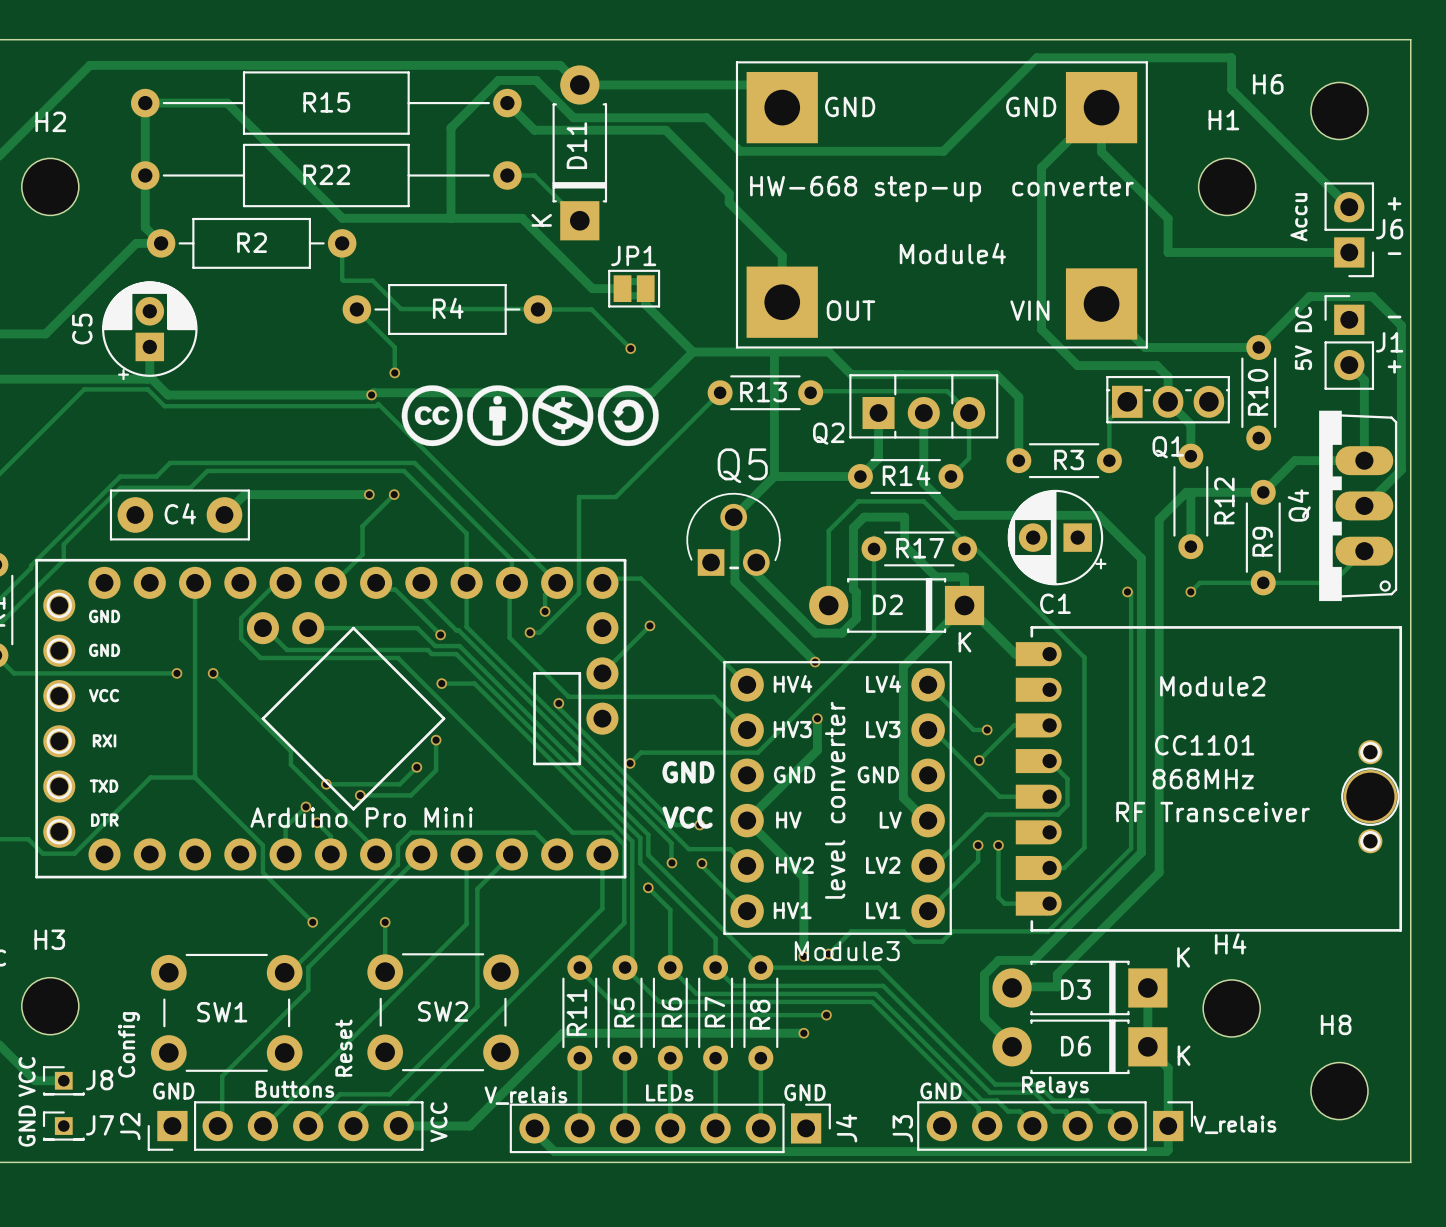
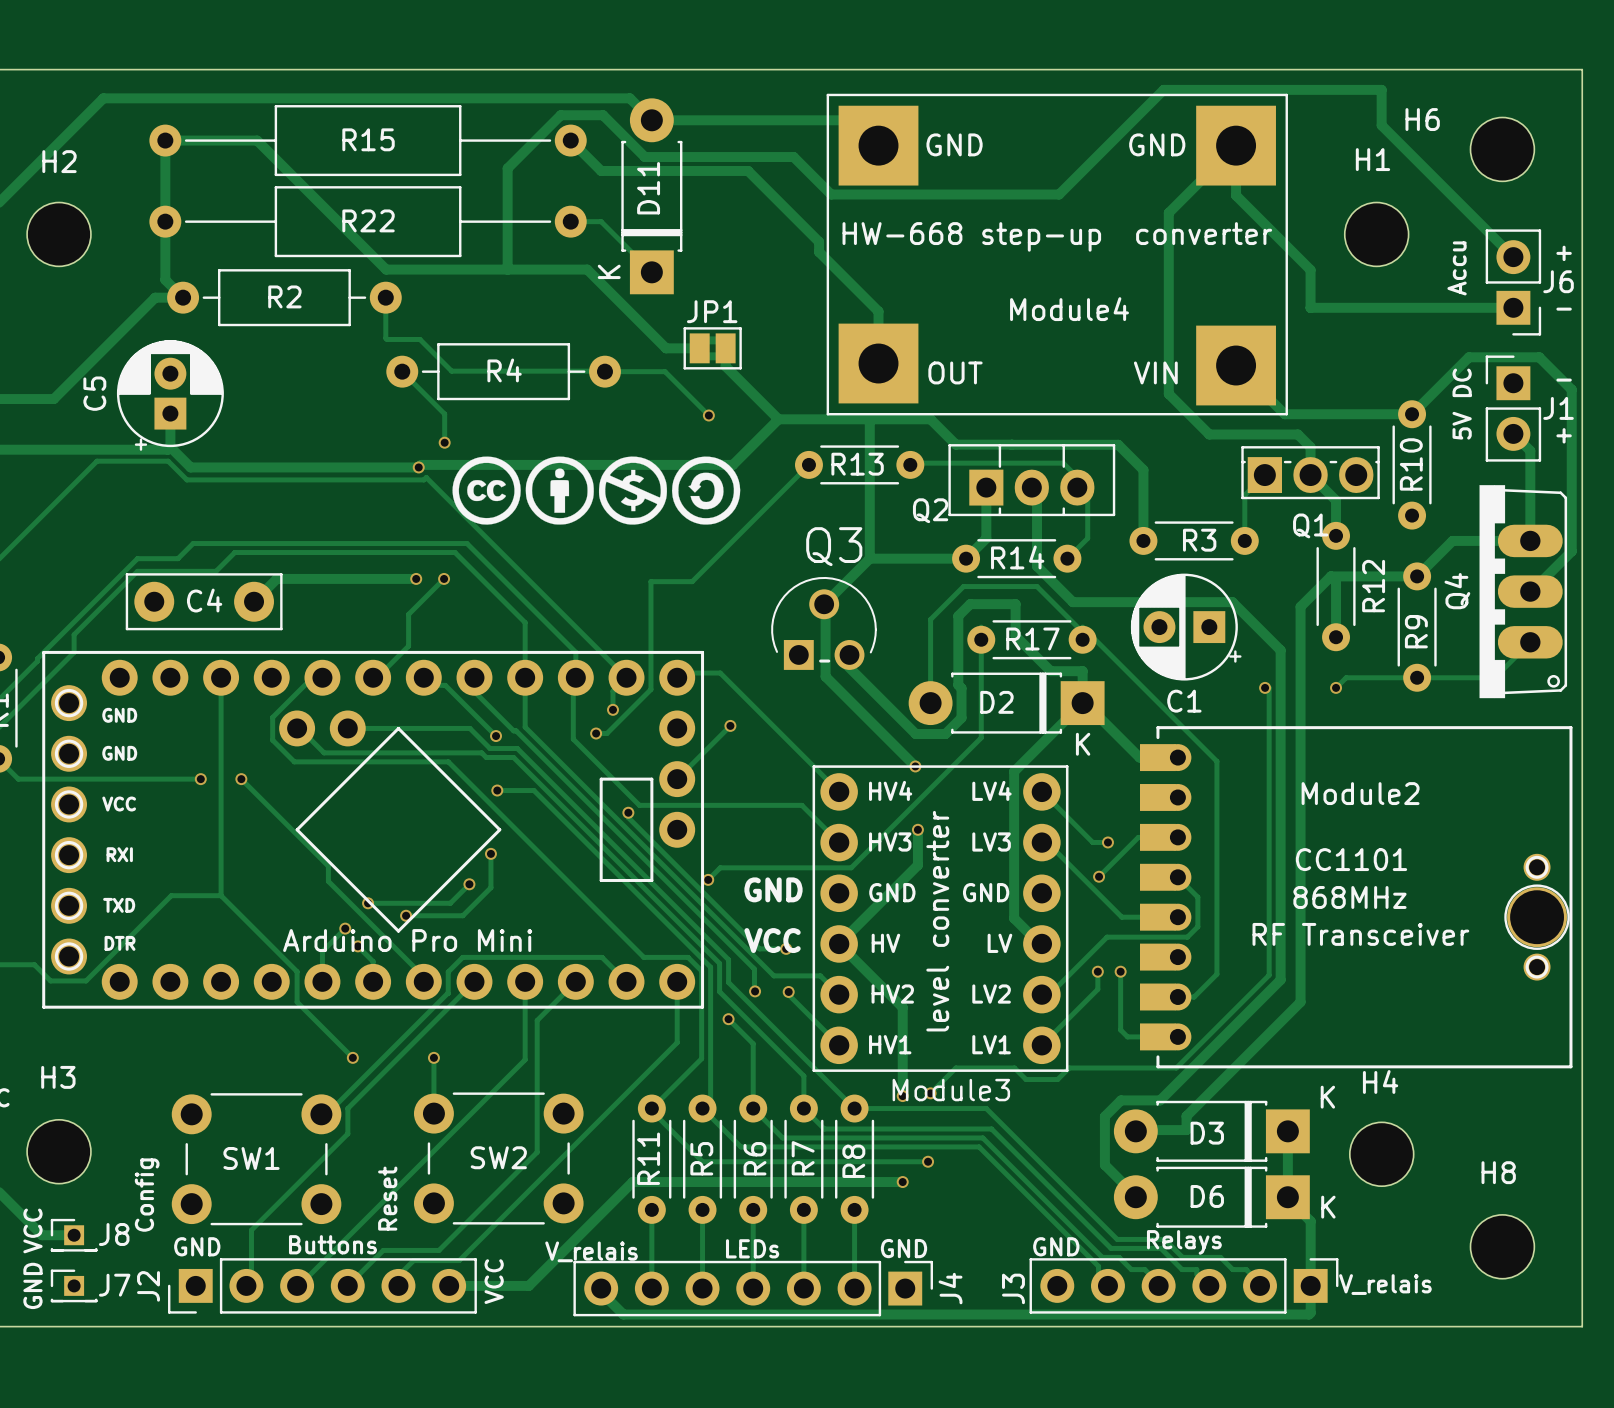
Q2 footprint: [849, 374, 999, 439] -> [948, 444, 1116, 517]
Q5 name: Q5 (742, 465) -> Q3 (834, 546)

